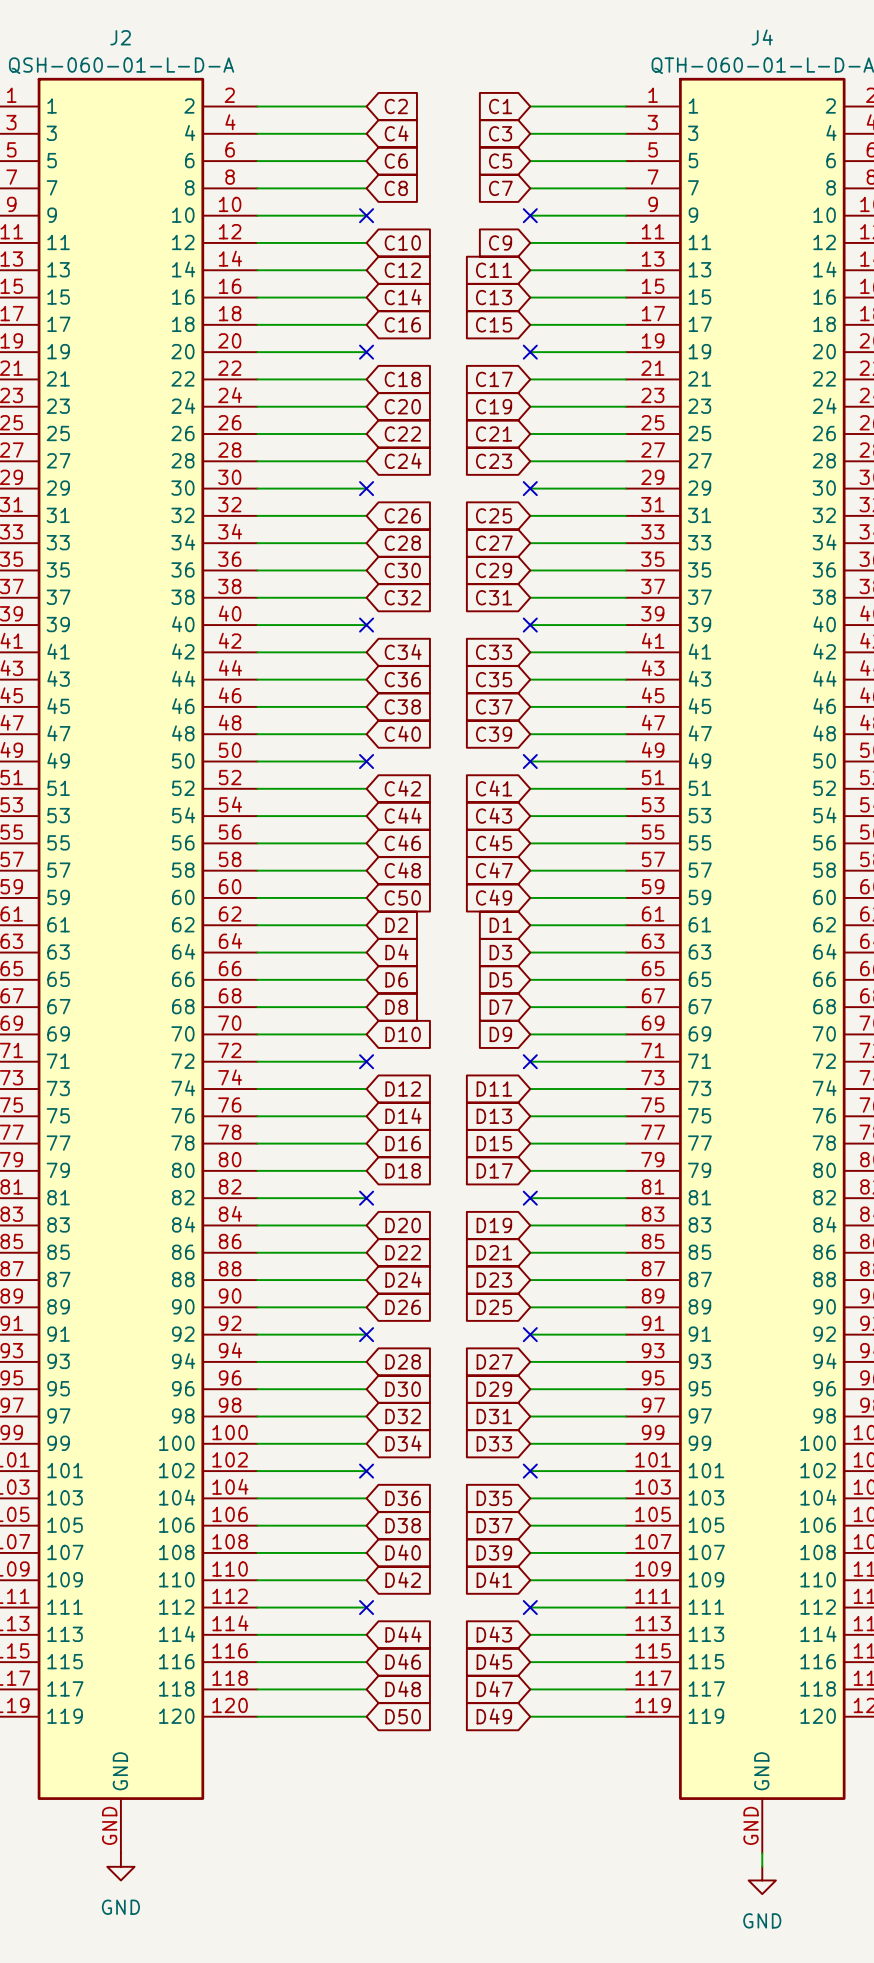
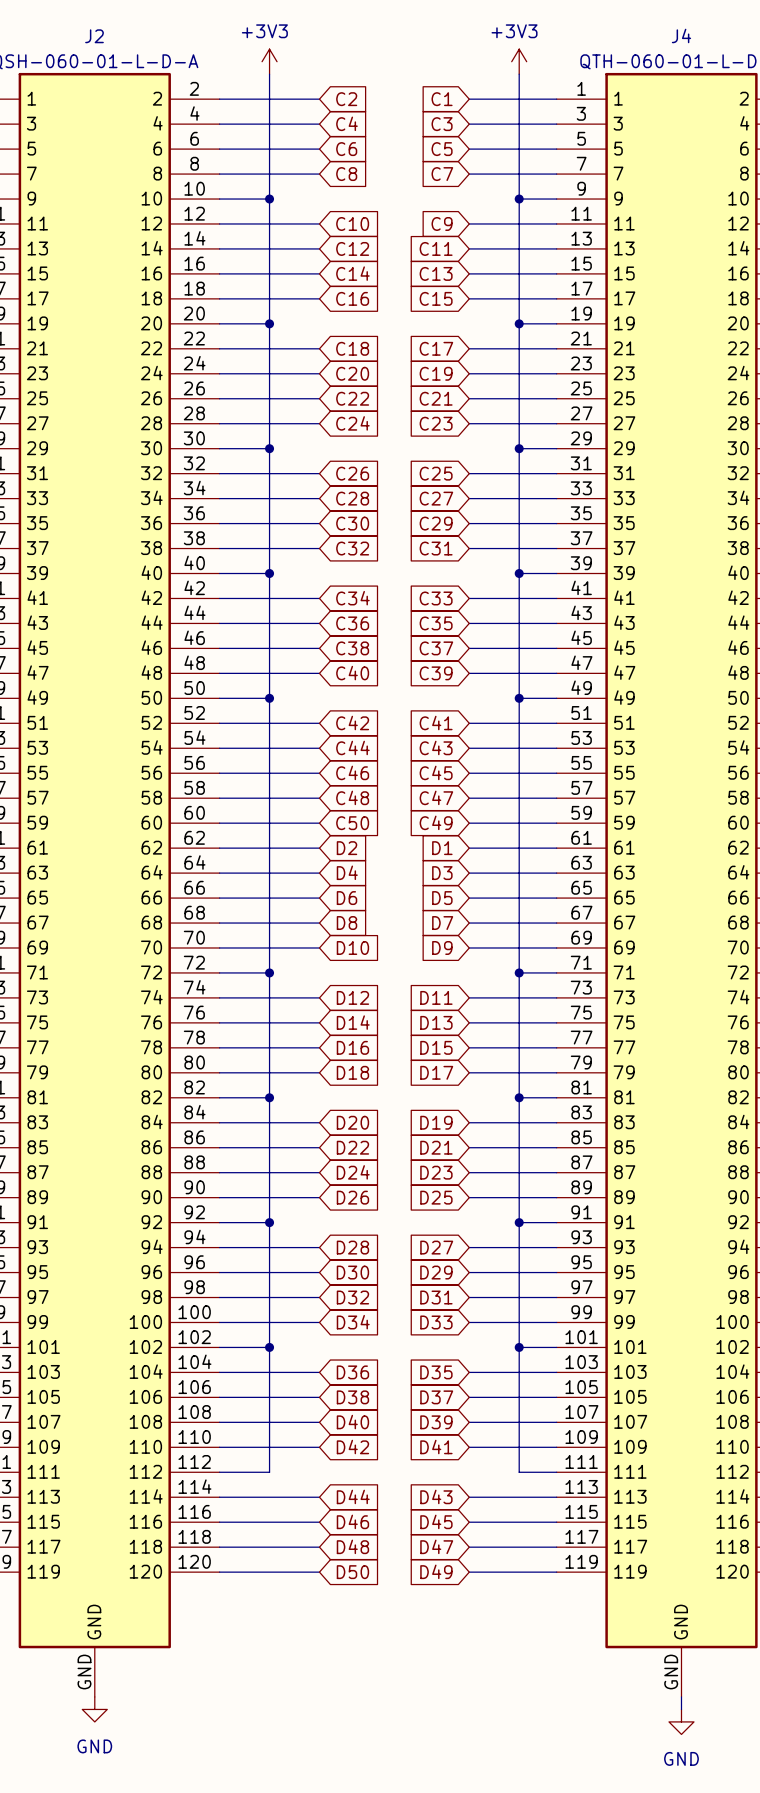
power symbol: none -> +3V3 (269, 61)
power symbol: none -> +3V3 (519, 61)
wire: (311, 215) (366, 215) -> none
junction: none -> (269, 199)
no-connect mark: (366, 215) -> none
wire: (530, 215) (584, 215) -> none
no-connect mark: (530, 215) -> none
junction: none -> (519, 199)
wire: (311, 352) (366, 352) -> none
junction: none -> (269, 323)
no-connect mark: (366, 352) -> none
wire: (530, 352) (584, 352) -> none
no-connect mark: (530, 352) -> none
junction: none -> (519, 323)
wire: (311, 488) (366, 488) -> none
junction: none -> (269, 448)
no-connect mark: (366, 488) -> none
wire: (530, 488) (584, 488) -> none
no-connect mark: (530, 488) -> none
junction: none -> (519, 448)
wire: (311, 625) (366, 625) -> none
junction: none -> (269, 573)
no-connect mark: (366, 625) -> none
wire: (530, 625) (584, 625) -> none
no-connect mark: (530, 625) -> none
junction: none -> (519, 573)
wire: (311, 761) (366, 761) -> none
junction: none -> (269, 698)
no-connect mark: (366, 761) -> none
wire: (530, 761) (584, 761) -> none
no-connect mark: (530, 761) -> none
junction: none -> (519, 698)
wire: (311, 1061) (366, 1061) -> none
junction: none -> (269, 972)
no-connect mark: (366, 1061) -> none
wire: (530, 1061) (584, 1061) -> none
no-connect mark: (530, 1061) -> none
junction: none -> (519, 972)
wire: (311, 1198) (366, 1198) -> none
junction: none -> (269, 1097)
no-connect mark: (366, 1198) -> none
wire: (530, 1198) (584, 1198) -> none
no-connect mark: (530, 1198) -> none
junction: none -> (519, 1097)
wire: (311, 1334) (366, 1334) -> none
junction: none -> (269, 1222)
no-connect mark: (366, 1334) -> none
wire: (530, 1334) (584, 1334) -> none
no-connect mark: (530, 1334) -> none
junction: none -> (519, 1222)
wire: (311, 1471) (366, 1471) -> none
junction: none -> (269, 1347)
no-connect mark: (366, 1471) -> none
wire: (530, 1471) (584, 1471) -> none
no-connect mark: (530, 1471) -> none
junction: none -> (519, 1347)
wire: (311, 1607) (366, 1607) -> (269, 1472) (269, 74)
no-connect mark: (366, 1607) -> none
wire: (530, 1607) (584, 1607) -> (519, 74) (519, 1472)
no-connect mark: (530, 1607) -> none

